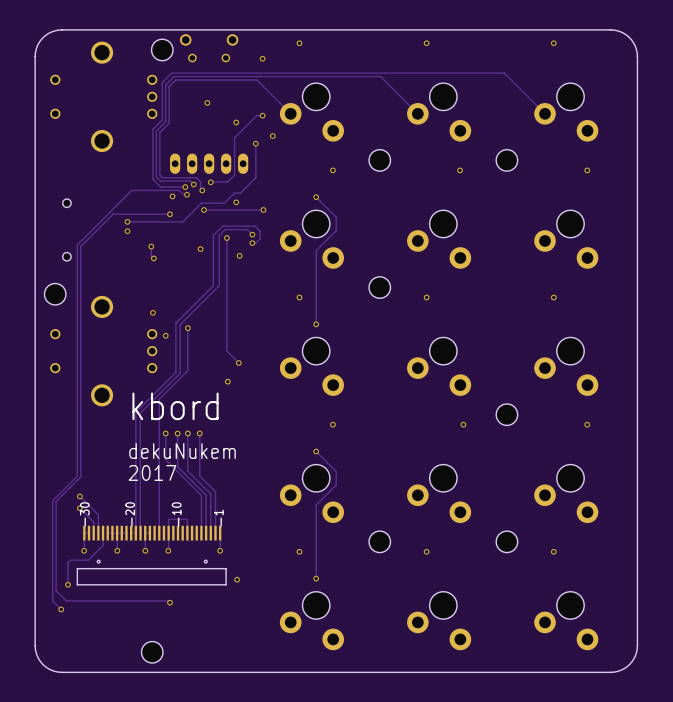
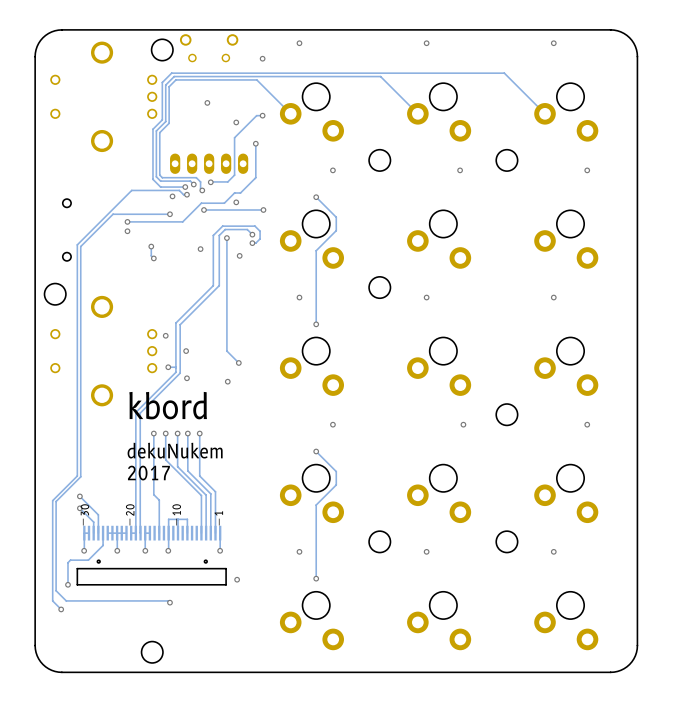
via: (272, 136) -> none
via: (152, 312) -> none
track: (187, 328) (187, 370) (159, 399) (159, 500) -> (153, 433) (153, 494) (159, 500)
via: (187, 328) -> none
via: none -> (186, 351)
track: none -> (168, 367) (175, 367)
via: none -> (168, 367)
via: none -> (186, 378)
via: none -> (153, 433)

